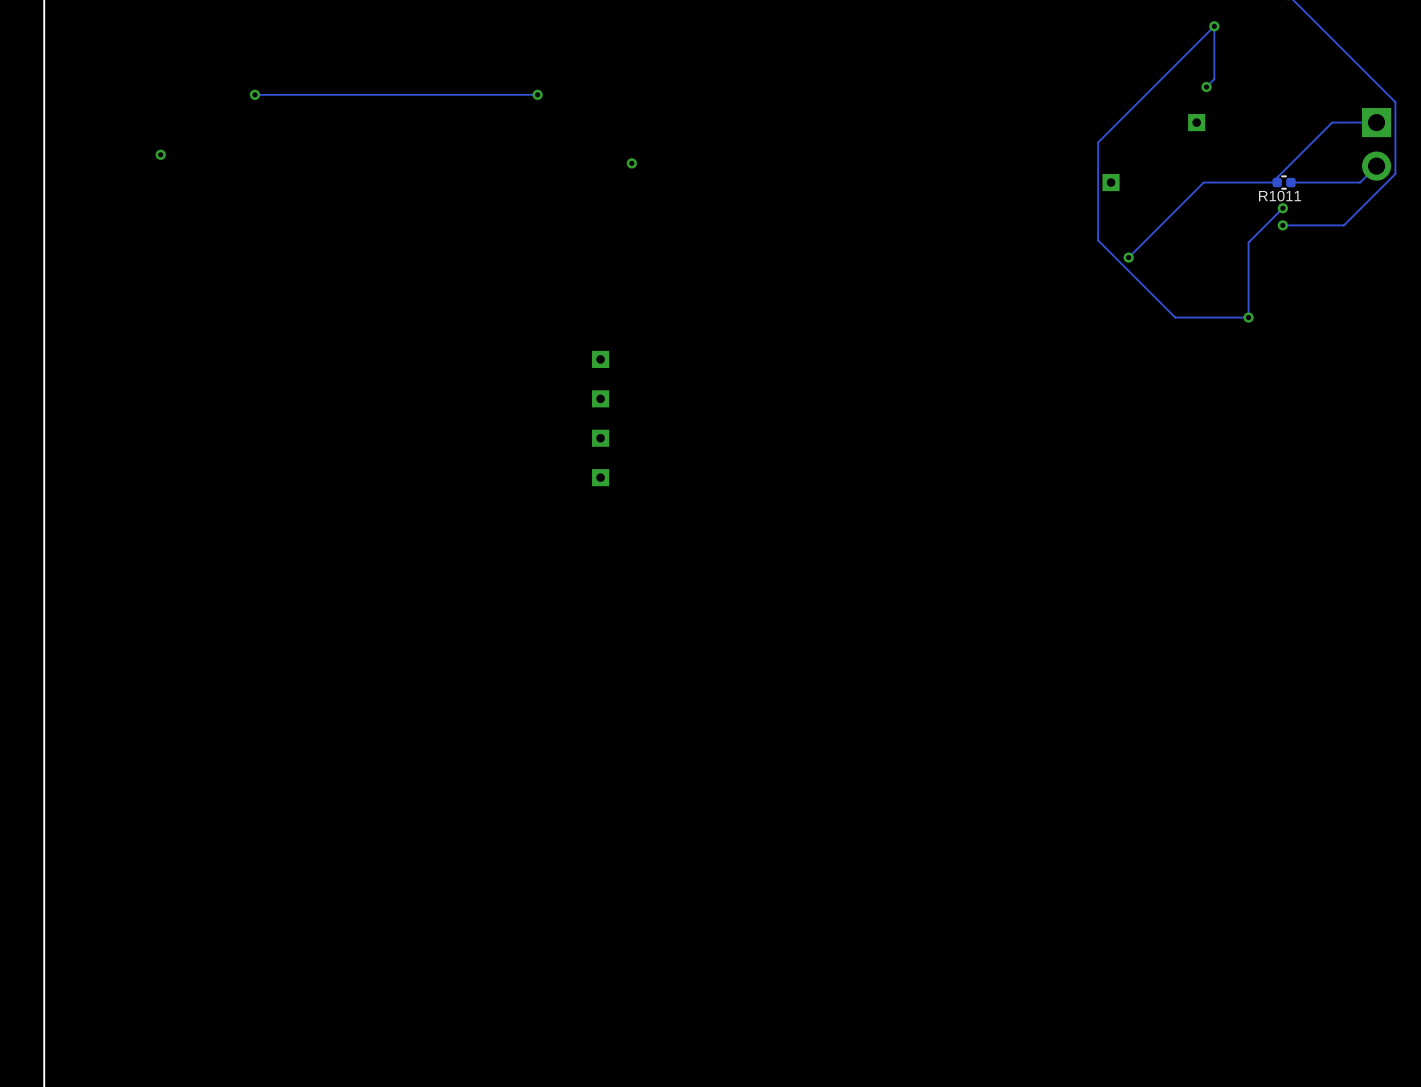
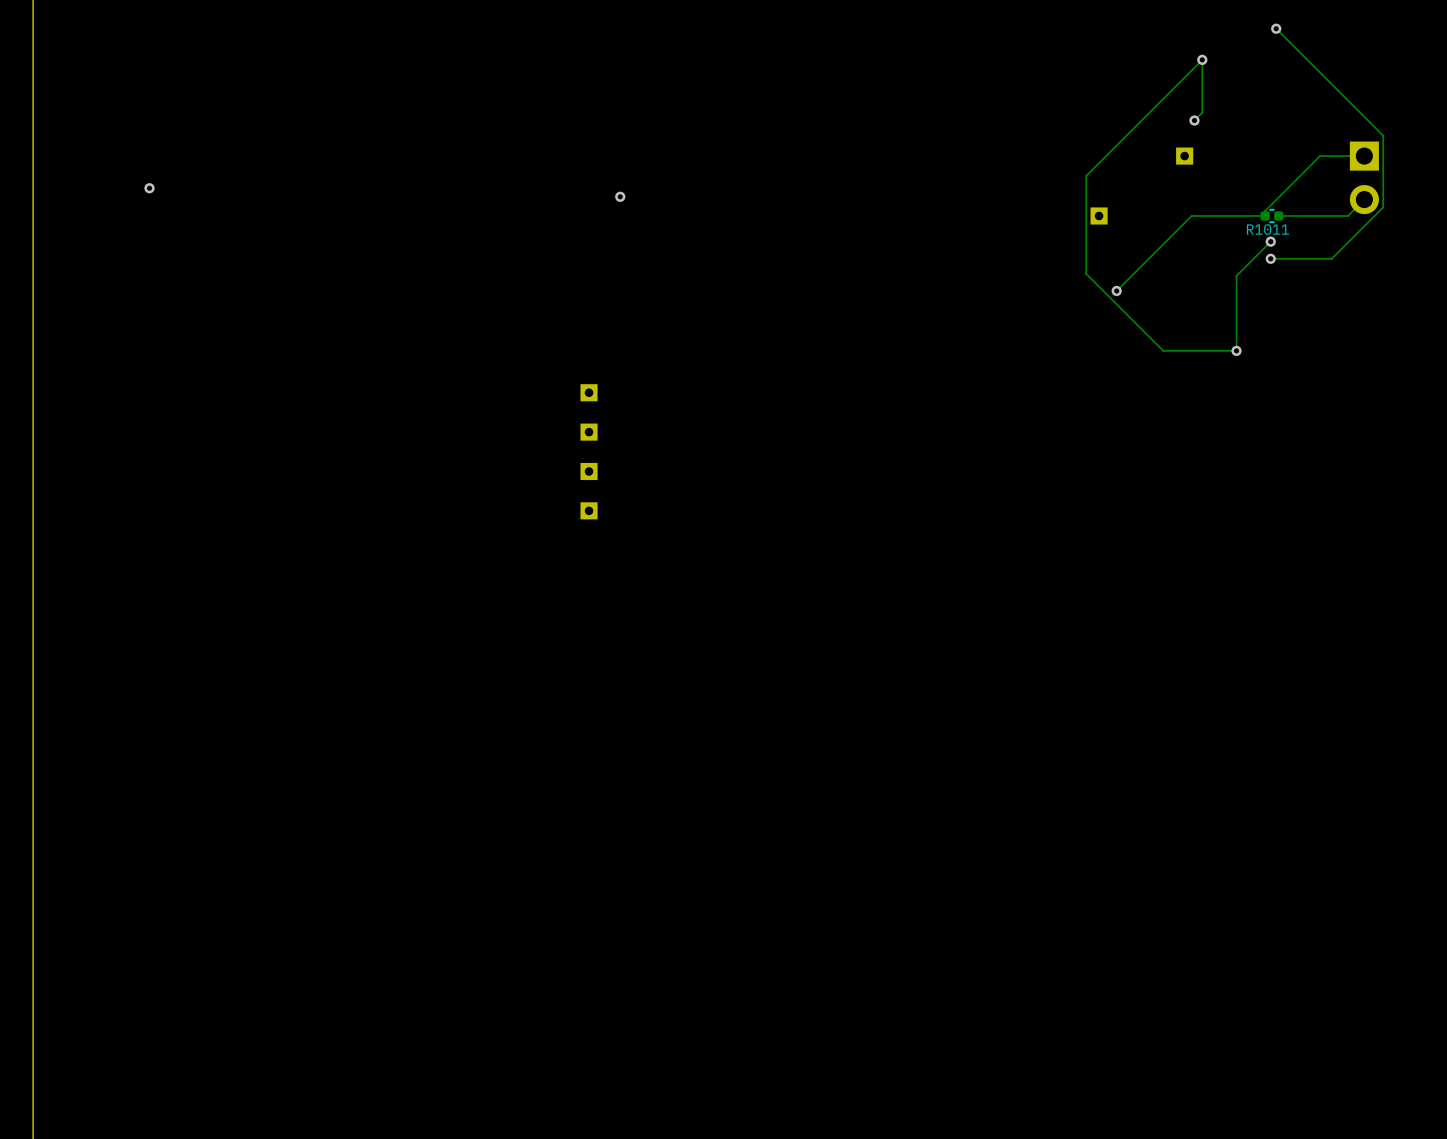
via: (254, 94) -> none
track: (537, 94) (254, 94) -> none
via: (537, 94) -> none

